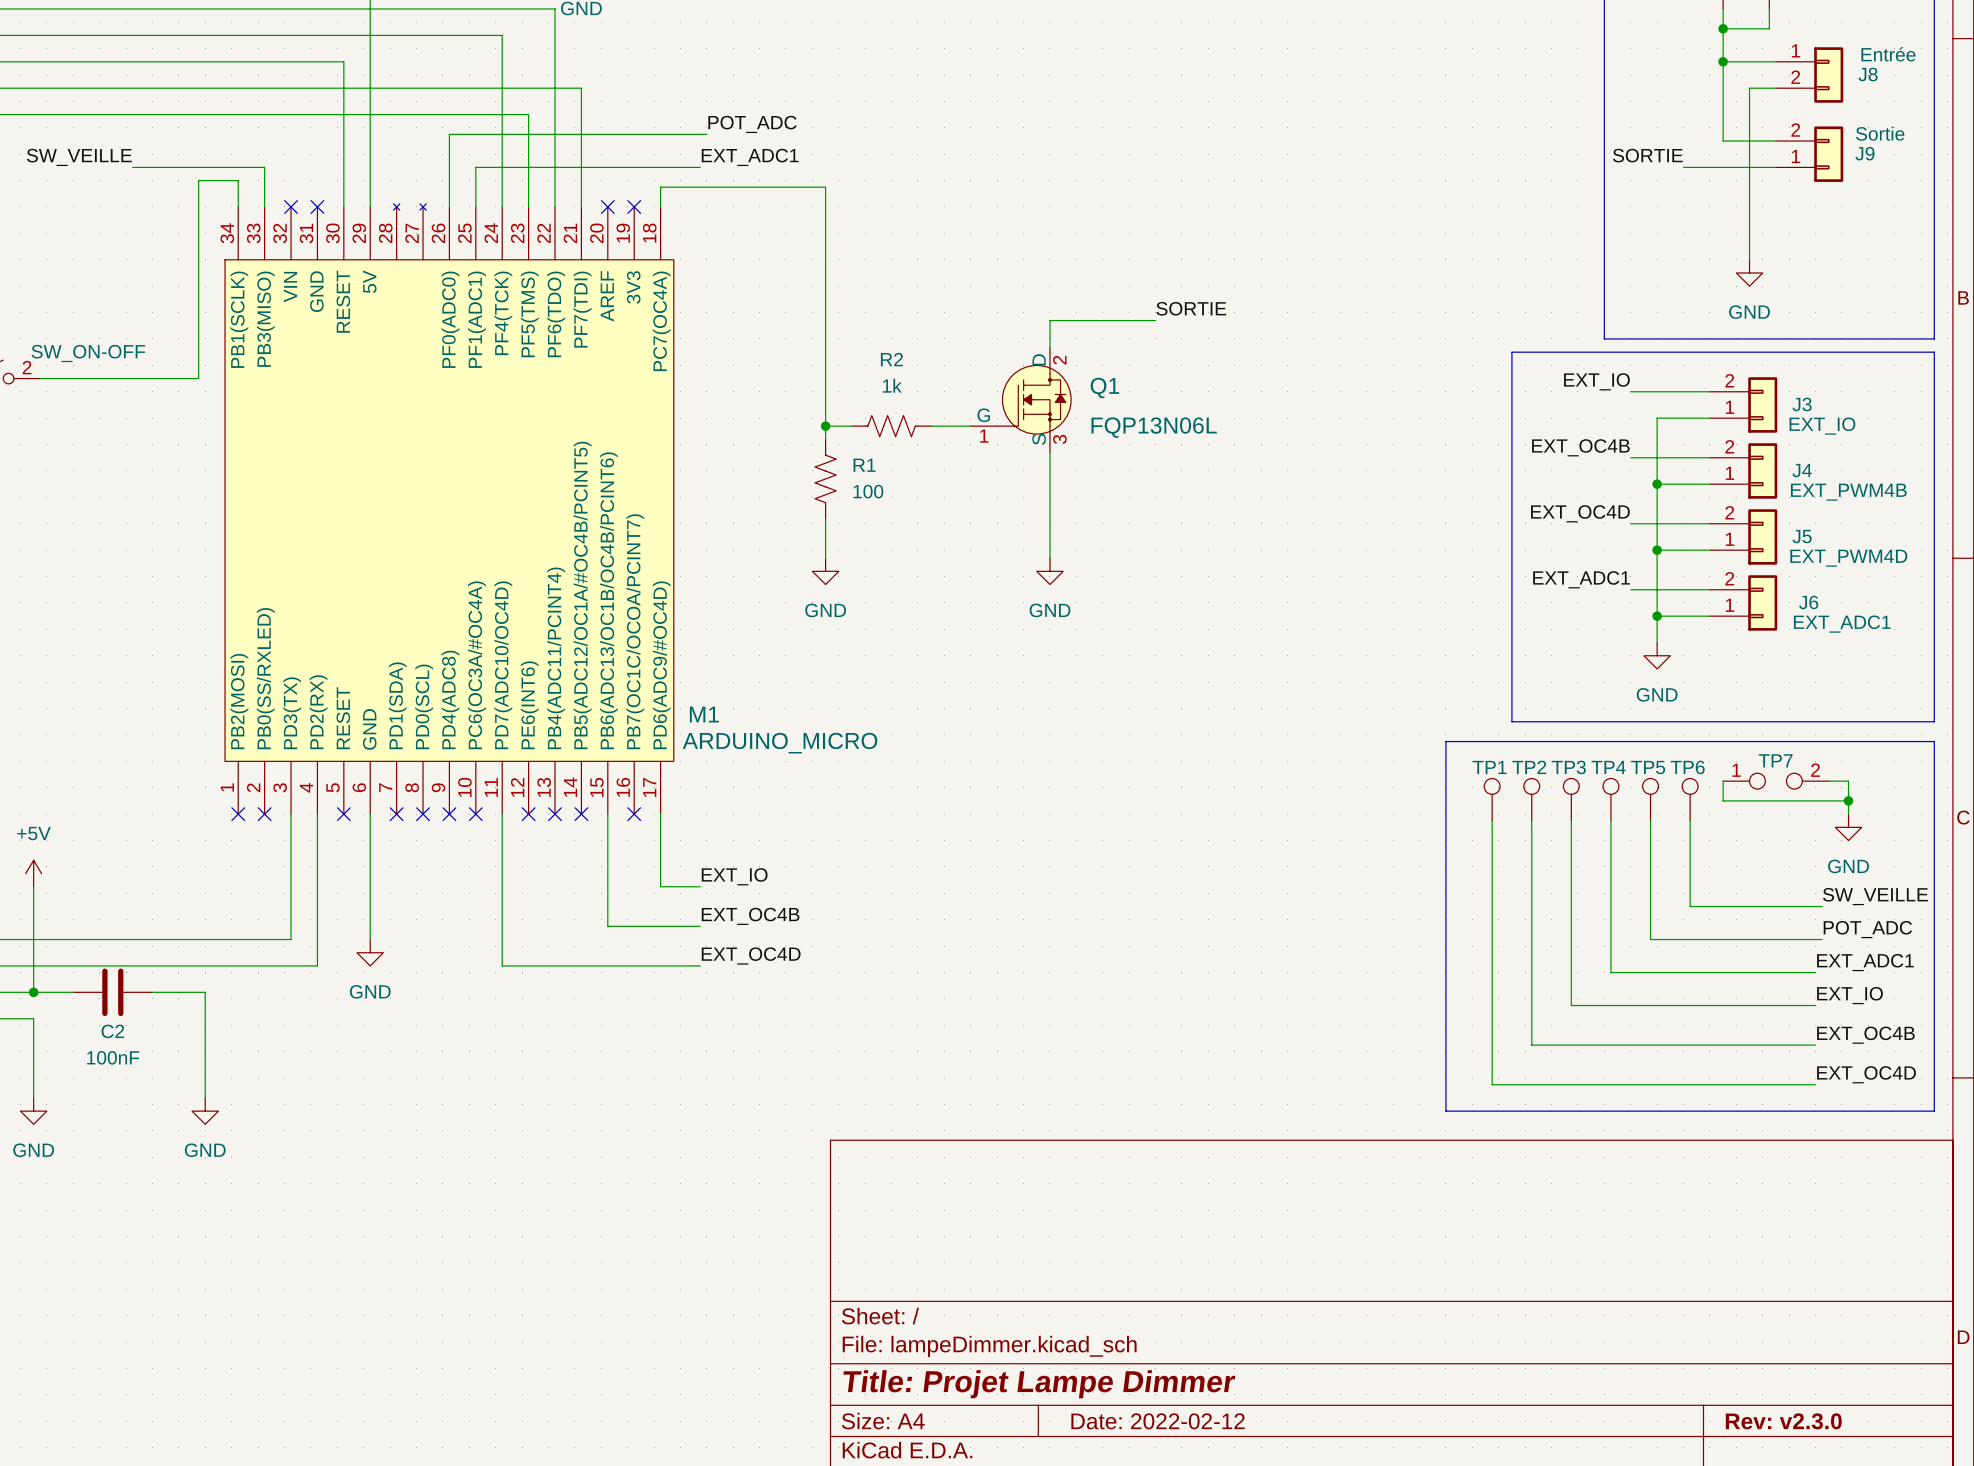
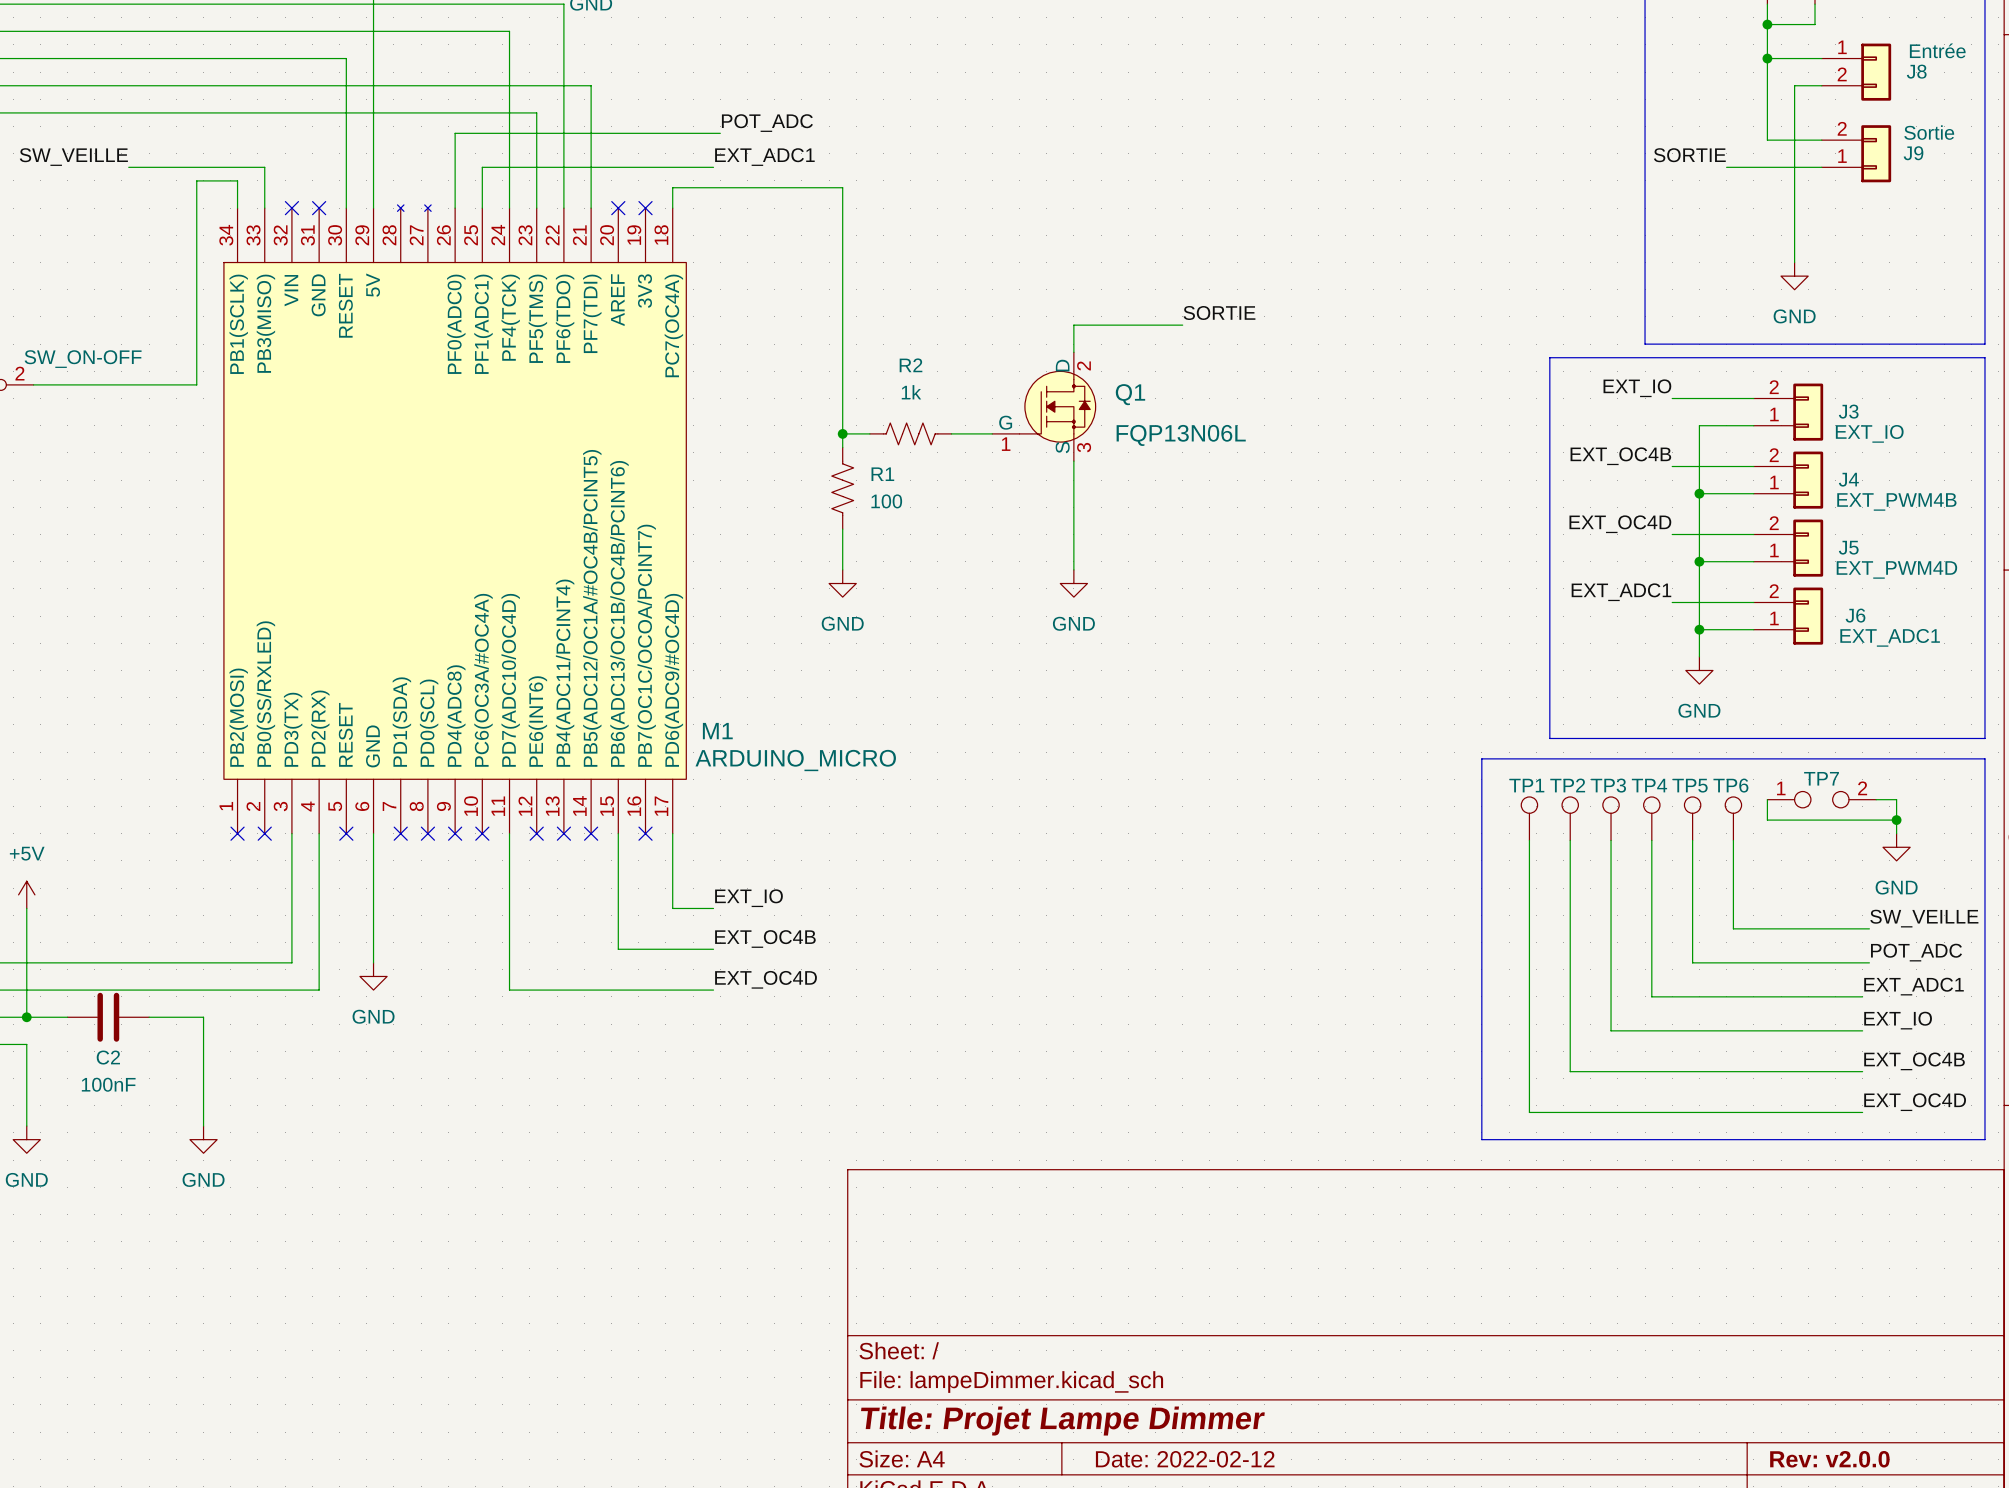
title block: Rev: v2.3.0 (1783, 1421) -> Rev: v2.0.0 (1829, 1459)

